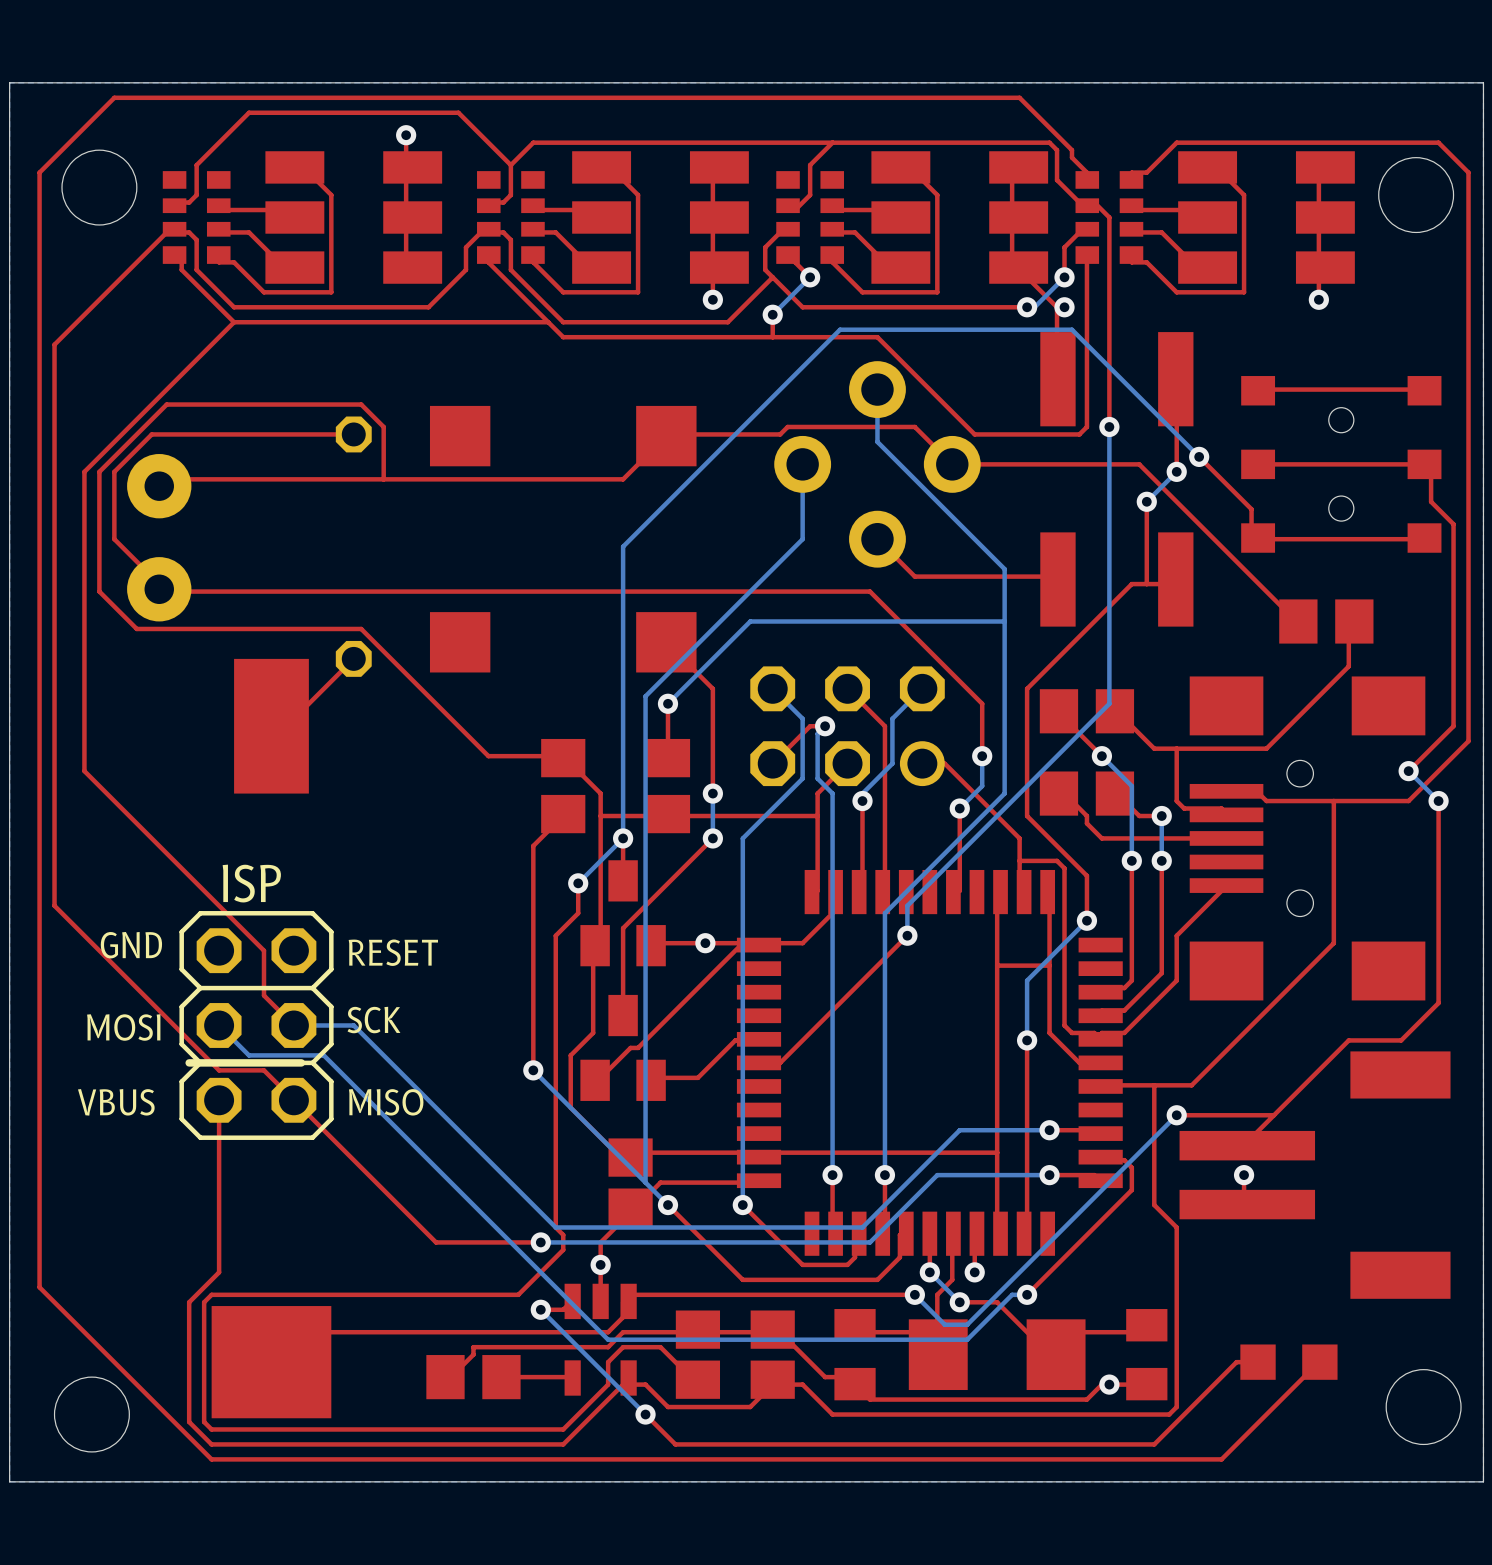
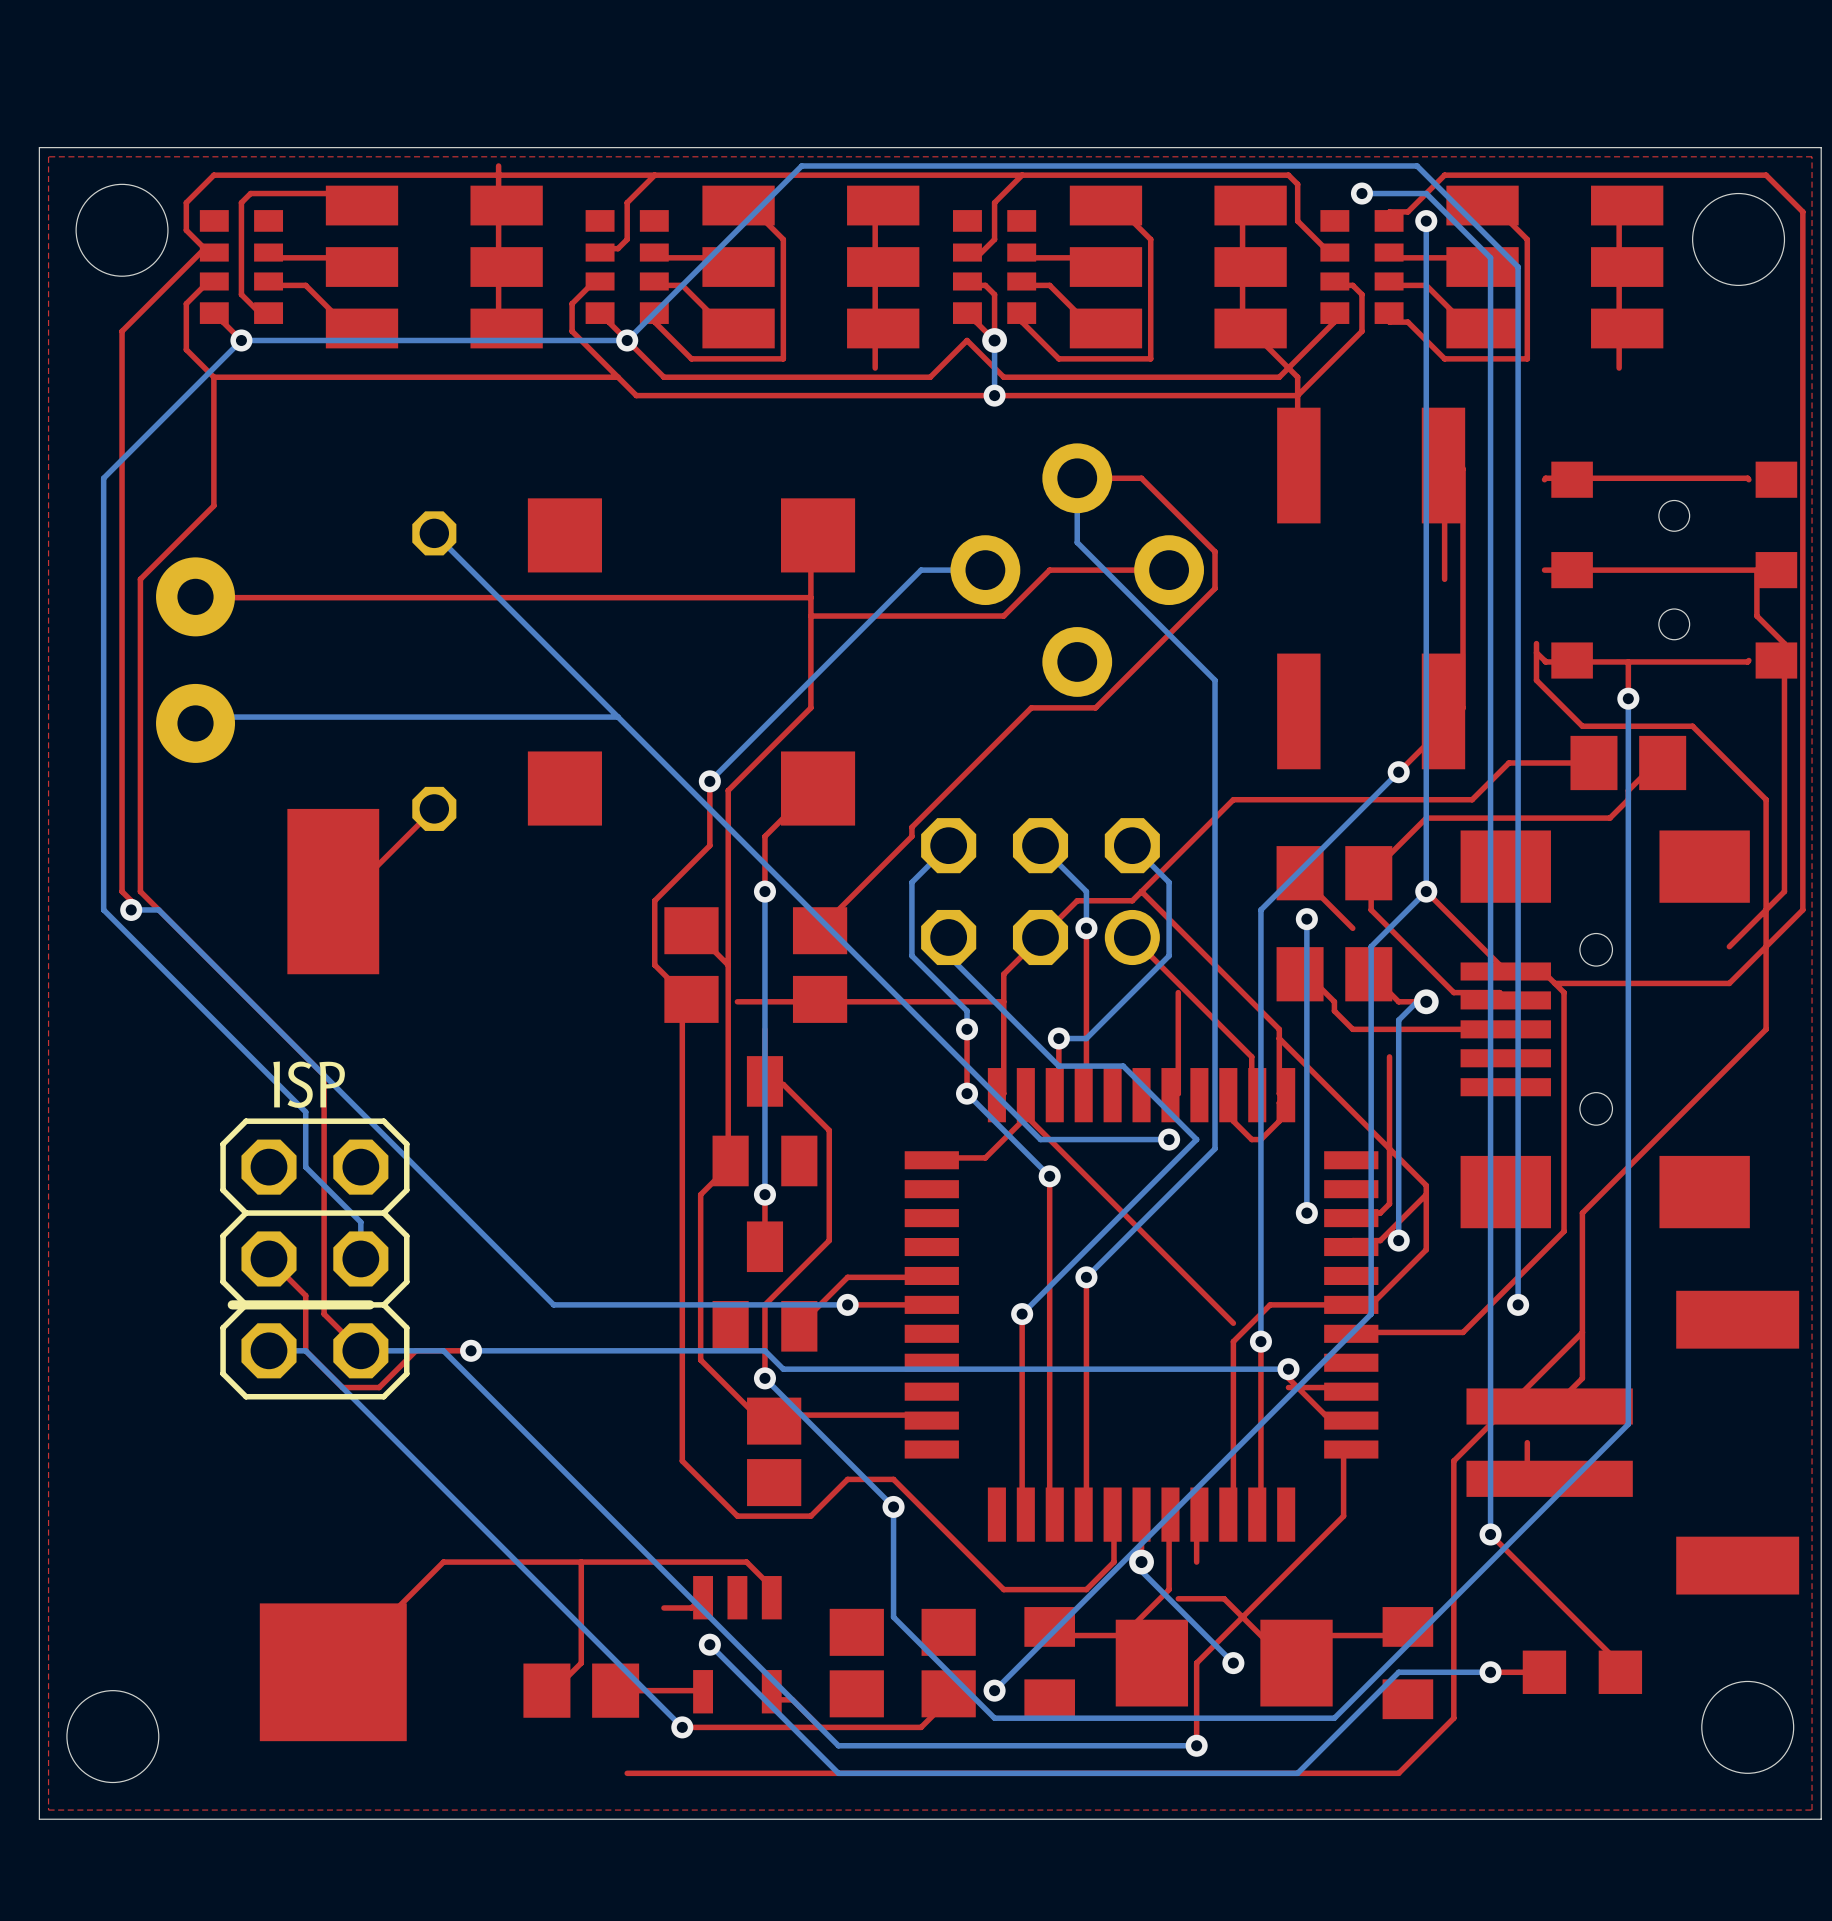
board edge: (1483, 120) (1483, 82) (9, 82) (9, 1481) (32, 1481) -> (1821, 147) (39, 147) (39, 1819)
top zone outline: none -> (1812, 156) (48, 156) (48, 1810) (1812, 1810) (1812, 156)
via: (406, 135) -> none
top track: none -> (654, 175) (213, 175) (186, 202) (186, 230) (204, 248)
top track: (204, 157) (249, 112) (458, 112) (510, 165) -> none
bottom track: none -> (1361, 193) (1426, 193) (1490, 257) (1490, 1534)
via: none -> (1361, 193)
top track: (294, 167) (301, 165) (331, 195) (331, 292) (263, 292) (234, 262) (219, 262) (218, 255) -> (362, 205) (351, 193) (250, 193)
top track: (1087, 179) (1086, 172) (1071, 157) (1071, 150) (1019, 97) (114, 97) (39, 172) (39, 1287) (211, 1459) (1221, 1459) (1319, 1362) -> (1490, 1534) (1628, 1672) (1620, 1672)
bottom track: none -> (1426, 221) (1426, 891) (1371, 946) (1371, 1314) (994, 1690)
via: none -> (1426, 221)
top track: (196, 195) (189, 202) (181, 202) (174, 205) -> (241, 239) (241, 294) (259, 312) (268, 313)
top track: (1087, 205) (1094, 202) (1109, 217) (1109, 239) -> (1334, 281) (1343, 285) (1352, 285) (1361, 294)
top track: (174, 229) (181, 232) (189, 232) (196, 239) (196, 269) (234, 307) -> (213, 377) (287, 377)
top track: (488, 229) (495, 232) (503, 232) (510, 239) (510, 269) (563, 322) -> (673, 395) (691, 395)
top track: (788, 229) (787, 224) (765, 247) (765, 269) (802, 307) (817, 307) -> (967, 281) (976, 285) (985, 285) (994, 294) (994, 340)
top track: (1087, 229) (1086, 232) (1079, 232) (1064, 247) (1064, 277) -> none
top track: (151, 247) (54, 344) (54, 905) (219, 1070) (263, 1070) -> (186, 303) (186, 349) (213, 377)
top track: (488, 255) (488, 262) (563, 337) (877, 337) (929, 389) -> (600, 313) (663, 377) (930, 377) (967, 340) (1003, 377)
top track: (181, 262) (181, 269) (234, 322) -> (223, 322) (241, 340)
top track: (1086, 262) (1086, 426) (1079, 434) (974, 434) -> (1334, 322) (1279, 377) (1260, 377)
top track: (465, 269) (428, 307) -> (618, 377) (526, 377)
top track: (1109, 269) (1109, 426) -> none
via: none -> (241, 340)
via: none -> (627, 340)
top track: (772, 277) (727, 322) -> (1361, 331) (1297, 395) (893, 395)
bottom track: (810, 277) (772, 314) -> (994, 340) (994, 395)
bottom track: (1064, 277) (1034, 307) (1027, 307) -> none
via: (1064, 277) -> none
via: (712, 299) -> none
via: (1318, 299) -> none
via: (1027, 307) -> none
via: (1064, 307) -> none
top track: (772, 314) (772, 337) -> none
via: (772, 314) -> none
top track: (234, 322) (84, 471) (84, 771) (263, 950) -> (140, 661) (140, 891) (324, 1075) (324, 1167)
top track: (518, 322) (234, 322) -> (636, 395) (572, 331)
via: none -> (994, 395)
top track: none -> (1461, 465) (1463, 707) (1461, 711) (1453, 717) (1398, 772)
bottom track: (1109, 426) (1109, 703) (907, 905) (907, 935) -> none
via: (1109, 426) -> none
top track: (353, 434) (151, 434) -> (213, 377) (213, 505) (186, 533)
bottom track: none -> (434, 533) (1040, 1139) (1169, 1139)
top track: (666, 436) (667, 434) (780, 434) (787, 426) (914, 426) (952, 464) (1139, 464) (1296, 621) -> (1040, 937) (1077, 900) (1132, 900) (1233, 799) (1472, 799) (1508, 762) (1591, 762)
top track: (660, 441) (623, 479) (159, 479) (159, 486) -> (810, 597) (195, 596)
top track: (1199, 456) (1251, 509) (1251, 524) -> none
bottom track: (1199, 456) (1071, 329) (840, 329) (623, 546) (623, 726) -> none
via: (1199, 456) -> none
bottom track: (802, 464) (802, 539) (645, 696) (645, 1182) -> (985, 570) (921, 570) (709, 781)
top track: none -> (1169, 570) (1049, 570) (1003, 616) (810, 616)
part position: (1341, 464) -> (1674, 570)
top track: (99, 471) (166, 404) (361, 404) (383, 426) (383, 479) -> (122, 579) (122, 331) (204, 248)
bottom track: (1176, 471) (1146, 501) -> none
via: (1176, 471) -> none
top track: (1146, 501) (1146, 584) -> none
via: (1146, 501) -> none
top track: none -> (1536, 652) (1536, 680) (1582, 726) (1692, 726) (1766, 799) (1766, 983)
top track: (114, 539) (159, 584) (159, 591) (869, 591) (982, 703) (982, 756) -> none
top track: (877, 539) (914, 576) (1057, 576) (1057, 579) -> none
top track: none -> (1628, 661) (1628, 698)
bottom track: (989, 554) (1004, 569) (1004, 793) (884, 913) (884, 1175) -> (1215, 680) (1215, 1148) (1086, 1277)
bottom track: none -> (1628, 698) (1628, 1424) (1334, 1718) (994, 1718) (893, 1617) (893, 1506) (764, 1378)
via: none -> (1628, 698)
top track: (1175, 579) (1169, 584) (1131, 584) (1027, 688) (1027, 816) (1086, 875) (1086, 920) -> none
bottom track: none -> (618, 717) (195, 717) (195, 723)
top track: (99, 591) (136, 628) (361, 628) (488, 756) (563, 756) -> (122, 726) (122, 891) (131, 900) (131, 909)
bottom track: (1004, 621) (750, 621) (667, 703) -> none
top track: (1348, 621) (1348, 666) (1266, 748) (1154, 748) (1116, 711) -> (1655, 762) (1628, 790) (1628, 799) (1609, 818) (1426, 818) (1371, 873) (1371, 909) (1444, 983)
via: none -> (1398, 772)
top track: none -> (709, 781) (709, 845) (654, 900) (654, 965) (691, 1001)
via: none -> (709, 781)
top track: (666, 642) (712, 688) (712, 793) -> (818, 788) (810, 790) (764, 836) (764, 891)
bottom track: (772, 688) (802, 718) (802, 778) (742, 838) (742, 1205) -> (948, 845) (911, 882) (911, 955) (967, 1010) (967, 1029)
top track: (847, 688) (884, 726) (884, 756) -> none
bottom track: none -> (1040, 845) (1086, 891) (1086, 928)
bottom track: (922, 688) (892, 718) (892, 763) (862, 793) (862, 801) -> (1132, 845) (1169, 882) (1169, 955) (1086, 1038) (1058, 1038)
top track: (667, 703) (667, 756) -> (1196, 533) (1215, 551) (1215, 588) (1095, 707) (1031, 707) (911, 827) (911, 836) (820, 928)
via: (667, 703) -> none
via: none -> (764, 891)
top track: (825, 726) (810, 726) (772, 763) -> none
bottom track: (825, 726) (817, 733) (817, 778) (832, 793) (832, 1175) -> none
via: (825, 726) -> none
top track: none -> (1141, 891) (1279, 1029) (1279, 1093) (1286, 1095) (1279, 1102) (1279, 1121) (1260, 1139) (1251, 1139) (1233, 1121) (1233, 1102) (1228, 1095)
top track: none -> (1426, 891) (1505, 971)
via: none -> (1426, 891)
bottom track: none -> (131, 909) (158, 909) (553, 1304) (847, 1304)
via: none -> (131, 909)
bottom track: none -> (1306, 919) (1306, 1213)
via: none -> (1306, 919)
top track: (1176, 748) (1176, 801) -> none
via: none -> (1086, 928)
bottom track: (982, 756) (982, 786) (959, 808) -> none
via: (982, 756) -> none
bottom track: (1101, 756) (1131, 786) (1131, 860) -> none
via: (1101, 756) -> none
bottom track: none -> (948, 937) (948, 955) (1058, 1066) (1123, 1066) (1196, 1139) (1022, 1314)
top track: (922, 763) (944, 763) (1019, 838) (1019, 860) (1057, 860) -> (1132, 937) (1251, 1056)
bottom track: (1408, 771) (1438, 801) -> none
via: (1408, 771) -> none
top track: (593, 786) (600, 793) (600, 943) (595, 945) -> (810, 542) (810, 707) (728, 790) (728, 1157) (730, 1160)
bottom track: (712, 793) (712, 838) -> none
via: (712, 793) -> none
top track: (862, 801) (862, 845) -> none
via: (862, 801) -> none
top track: none -> (1554, 983) (1564, 992) (1564, 1231)
top track: (1333, 801) (1333, 943) -> (1766, 1029) (1637, 1157)
via: (1438, 801) -> none
via: (959, 808) -> none
bottom track: none -> (1417, 1001) (1398, 1020) (1398, 1240)
bottom track: (1161, 816) (1161, 860) -> none
top track: (555, 823) (533, 845) (533, 1070) -> none
bottom track: (623, 838) (578, 883) -> (764, 1029) (764, 1194)
via: (623, 838) -> none
top track: (712, 838) (623, 928) (623, 973) -> none
via: (712, 838) -> none
via: none -> (967, 1029)
top track: (1438, 838) (1438, 1003) (1401, 1040) (1348, 1040) (1244, 1145) (1247, 1145) -> none
via: none -> (1058, 1038)
top track: none -> (1279, 1038) (1297, 1056)
via: (1131, 860) -> none
top track: (1161, 860) (1161, 965) -> (1306, 1066) (1426, 1185)
via: (1161, 860) -> none
top track: (1064, 868) (1064, 1025) (1071, 1032) (1094, 1032) (1100, 1039) (1101, 1032) (1124, 1032) (1176, 980) (1176, 935) (1226, 885) -> none
top track: (578, 883) (578, 913) (555, 935) -> (682, 1010) (682, 1148)
via: (578, 883) -> none
bottom track: none -> (967, 1093) (1049, 1176)
via: none -> (967, 1093)
top track: none -> (1025, 1095) (1022, 1112) (1233, 1323)
top track: (1000, 892) (997, 898) (997, 1227) (1000, 1233) -> (1325, 1304) (1270, 1304) (1233, 1341) (1233, 1506) (1228, 1514)
top track: (1047, 892) (1049, 898) (1049, 1032) (1079, 1062) -> none
bottom track: (1086, 920) (1027, 980) -> (1398, 772) (1260, 909) (1260, 1203)
via: (1086, 920) -> none
via: none -> (1169, 1139)
top track: (907, 935) (780, 1062) (759, 1062) -> (847, 1304) (931, 1304)
via: (907, 935) -> none
via: (705, 943) -> none
text: GND (131, 945) -> none
top track: (651, 945) (653, 943) (757, 943) (759, 945) (742, 943) (675, 1010) -> (764, 1081) (764, 1084) (783, 1084) (829, 1130) (829, 1240)
top track: (593, 950) (593, 1032) (570, 1055) -> (728, 1167) (700, 1194) (700, 1295)
text: RESET (393, 952) -> none
via: none -> (1049, 1176)
top track: (1049, 965) (997, 965) -> (1141, 478) (1077, 478)
via: none -> (764, 1194)
top track: none -> (1426, 1194) (1426, 1249) (1371, 1304) (1351, 1304)
via: none -> (1306, 1213)
top track: (1288, 988) (1273, 1003) -> (1582, 1213) (1582, 1378) (1554, 1405) (1549, 1406)
top track: (263, 995) (293, 1025) -> (324, 1222) (324, 1314)
via: none -> (1398, 1240)
text: SCK (373, 1020) -> none
top track: none -> (268, 1258) (305, 1295) (305, 1350) (342, 1387) (379, 1387) (415, 1350) (471, 1350)
bottom track: (219, 1025) (249, 1055) (323, 1055) (608, 1339) (967, 1339) (1012, 1294) (1027, 1294) -> none
bottom track: (293, 1025) (353, 1025) (555, 1227) (862, 1227) (959, 1130) (1049, 1130) -> (360, 1258) (360, 1222) (305, 1167) (305, 1112) (103, 909) (103, 478) (241, 340) (627, 340) (801, 165) (1417, 165) (1518, 267) (1518, 1304)
text: MOSI (123, 1027) -> none
top track: (735, 1040) (697, 1077) (653, 1077) -> (902, 1277) (847, 1277) (801, 1323)
top track: none -> (1086, 1277) (1086, 1442)
via: none -> (1086, 1277)
top track: (1027, 1040) (1027, 1092) -> (967, 1029) (967, 1093)
bottom track: none -> (1260, 1277) (1260, 1341)
via: (1027, 1040) -> none
top track: (638, 1047) (630, 1047) (600, 1077) (595, 1080) -> (783, 1286) (764, 1304) (764, 1378)
via: none -> (847, 1304)
via: none -> (1518, 1304)
bottom track: (533, 1070) (667, 1205) -> none
via: (533, 1070) -> none
top track: none -> (1022, 1314) (1022, 1442)
via: none -> (1022, 1314)
top track: (1154, 1085) (1154, 1205) (1176, 1227) (1176, 1407) -> (1582, 1332) (1453, 1461) (1453, 1718) (1444, 1727)
via: none -> (1260, 1341)
top track: (219, 1100) (219, 1272) (189, 1302) (189, 1422) (211, 1444) (510, 1444) -> none
bottom track: none -> (268, 1350) (305, 1350) (682, 1727)
top track: (293, 1100) (436, 1242) (540, 1242) -> none
bottom track: none -> (360, 1350) (443, 1350) (838, 1745) (1196, 1745)
bottom track: none -> (471, 1350) (764, 1350) (783, 1369) (1288, 1369)
via: none -> (471, 1350)
text: VBUS (116, 1102) -> none
text: MISO (386, 1102) -> none
bottom track: (1176, 1115) (967, 1324) (944, 1324) (914, 1294) -> none
via: (1176, 1115) -> none
top track: (1273, 1115) (1176, 1115) -> none
via: none -> (764, 1378)
via position: (1049, 1130) -> (1288, 1369)
top track: (997, 1152) (765, 1152) (759, 1157) -> none
top track: (1100, 1157) (1101, 1160) (1124, 1160) (1131, 1167) (1131, 1190) (1027, 1294) -> (1351, 1420) (1343, 1415) (1325, 1415) (1288, 1378) (1288, 1369)
via: (832, 1175) -> none
via: (884, 1175) -> none
top track: (1049, 1175) (1094, 1175) (1100, 1180) -> (1196, 1745) (1196, 1663) (1343, 1516) (1343, 1451) (1351, 1449)
bottom track: (1049, 1175) (937, 1175) (869, 1242) (540, 1242) -> none
via: (1049, 1175) -> none
via: (1244, 1175) -> none
part position: (1315, 1175) -> (1632, 1442)
top track: (759, 1180) (757, 1182) (660, 1182) (600, 1242) (600, 1301) -> none
top track: (555, 1190) (555, 1227) (563, 1234) (563, 1249) (518, 1294) (211, 1294) (204, 1302) (204, 1422) (211, 1429) (563, 1429) (608, 1384) (608, 1362) (623, 1347) (660, 1347) (697, 1384) -> (682, 1461) (737, 1516) (810, 1516) (847, 1479) (893, 1479) (1003, 1589)
top track: (667, 1205) (742, 1279) (877, 1279) (899, 1257) (899, 1234) (906, 1233) -> none
via: (667, 1205) -> none
top track: (742, 1205) (802, 1264) (847, 1264) (855, 1257) (855, 1234) (859, 1233) -> (1049, 1176) (1049, 1506) (1054, 1514)
via: (742, 1205) -> none
via: none -> (893, 1506)
via: (540, 1242) -> none
via: none -> (1490, 1534)
via: (600, 1264) -> none
bottom track: (929, 1272) (959, 1302) -> none
via: (974, 1272) -> none
bottom track: none -> (1141, 1571) (1233, 1663)
top track: (952, 1279) (937, 1294) (937, 1354) -> (1169, 1571) (1169, 1589) (1123, 1635) (1151, 1663)
top track: (817, 1294) (630, 1294) (628, 1301) (623, 1302) (623, 1317) (608, 1332) (301, 1332) -> (771, 1597) (764, 1589) (764, 1580) (746, 1562) (443, 1562) (370, 1635)
top track: (914, 1294) (884, 1294) -> (1112, 1514) (1113, 1562) (1086, 1589)
via: (914, 1294) -> none
via: (1027, 1294) -> none
via: (959, 1302) -> none
bottom track: (540, 1309) (645, 1414) -> none
via: (540, 1309) -> none
bottom track: none -> (709, 1644) (838, 1773) (1297, 1773) (1398, 1672) (1490, 1672)
via: none -> (709, 1644)
top track: (473, 1347) (608, 1347) (623, 1332) (772, 1332) (772, 1324) (825, 1377) (855, 1377) (855, 1384) (869, 1399) (1086, 1399) (1101, 1384) (1146, 1384) -> (581, 1653) (581, 1562)
via: none -> (1233, 1663)
via: none -> (1490, 1672)
top track: (1236, 1362) (1154, 1444) (1139, 1444) -> (1435, 1736) (1398, 1773)
top track: none -> (1518, 1672) (1490, 1672)
via: none -> (994, 1690)
top track: (628, 1378) (563, 1444) -> (829, 1773) (691, 1773)
top track: (772, 1384) (802, 1384) (832, 1414) (1169, 1414) -> none
via: (1109, 1384) -> none
via: none -> (682, 1727)
top track: none -> (820, 1727) (682, 1727)
top track: (645, 1414) (675, 1444) -> none
via: (645, 1414) -> none
via: none -> (1196, 1745)

